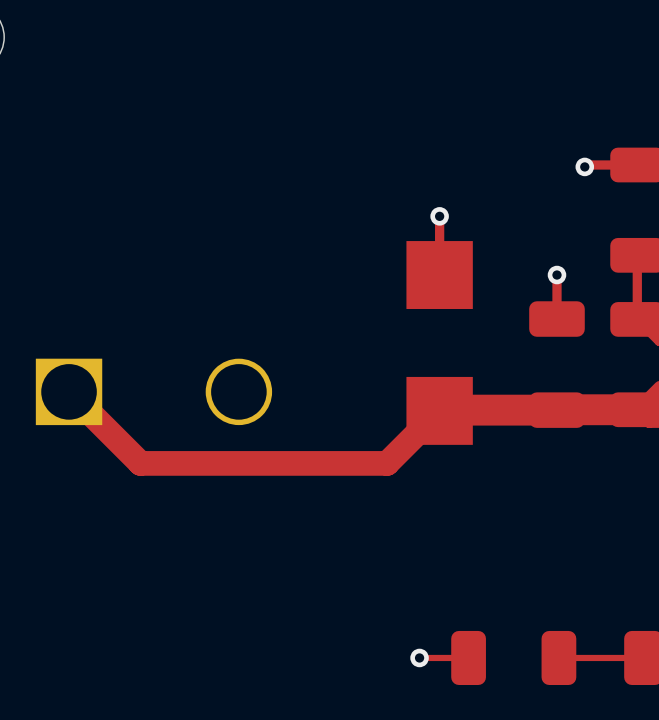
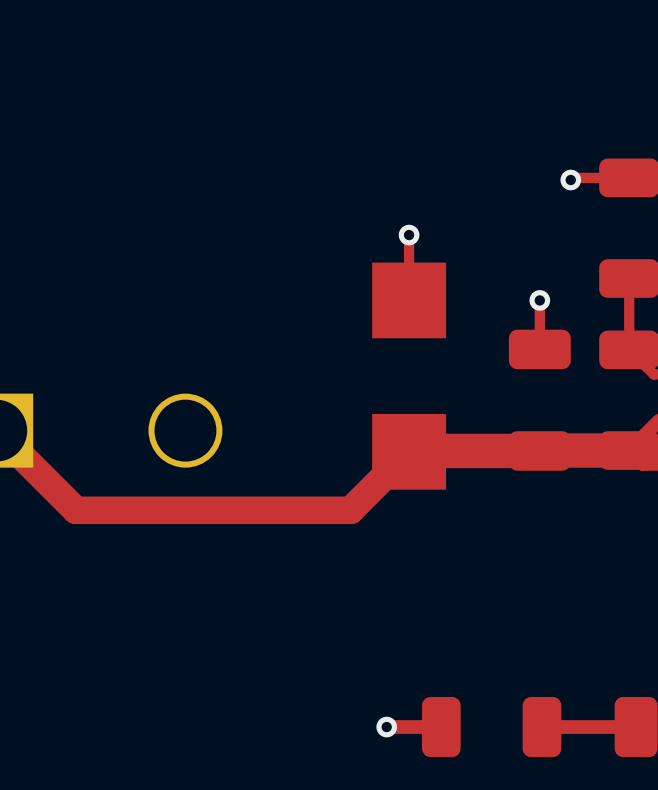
top track width: thin (468, 657) (419, 657) -> thick (441, 727) (386, 727)
top track width: thin (643, 657) (558, 657) -> thick (636, 727) (541, 727)

